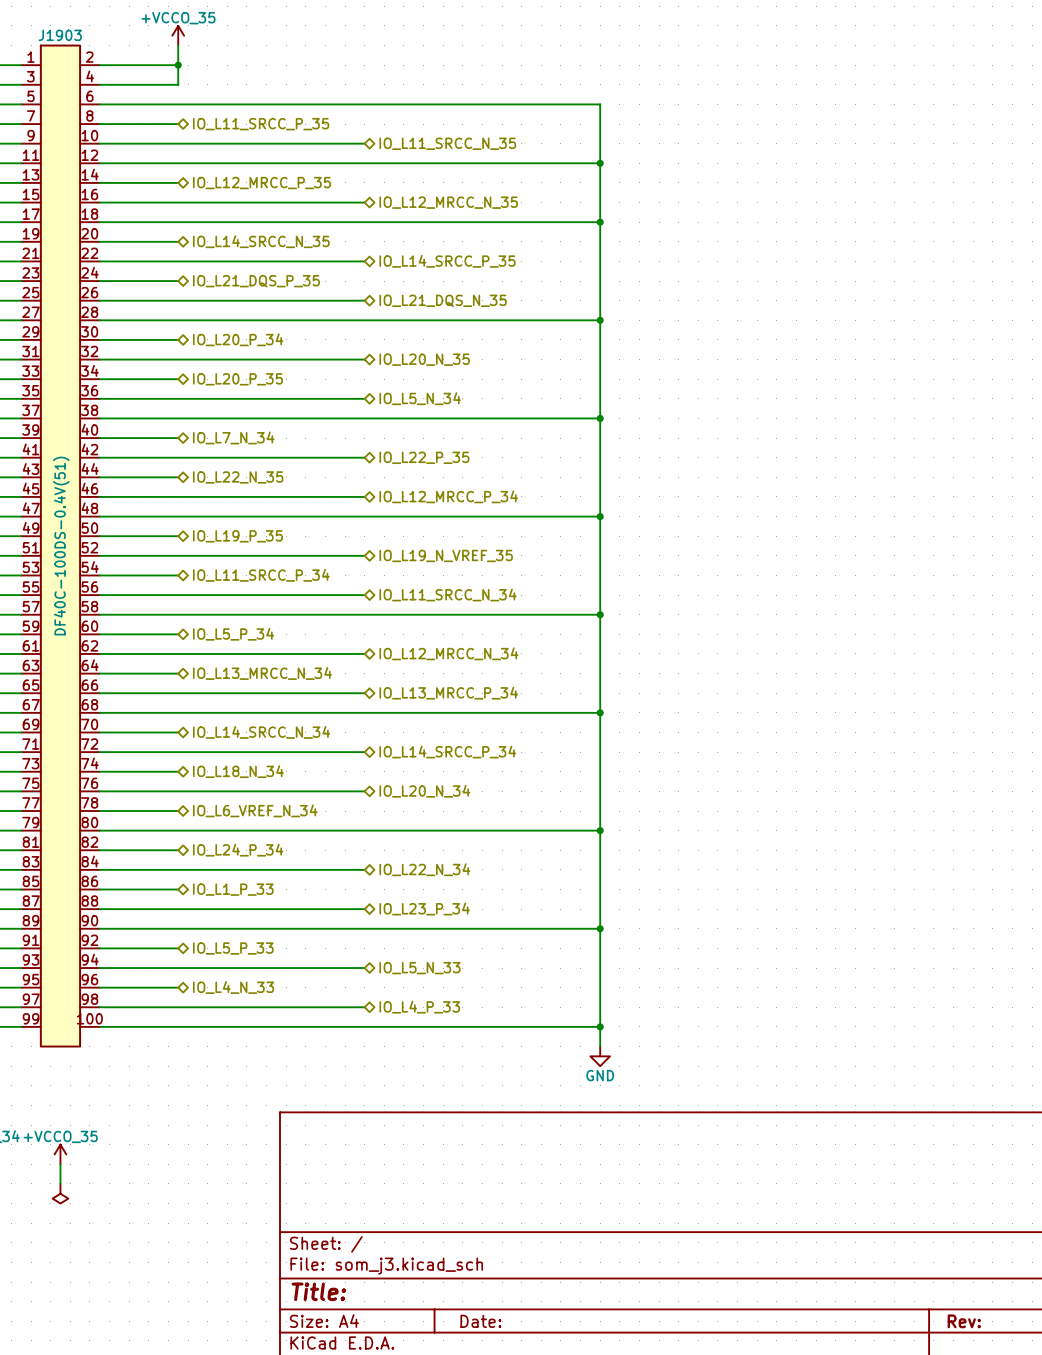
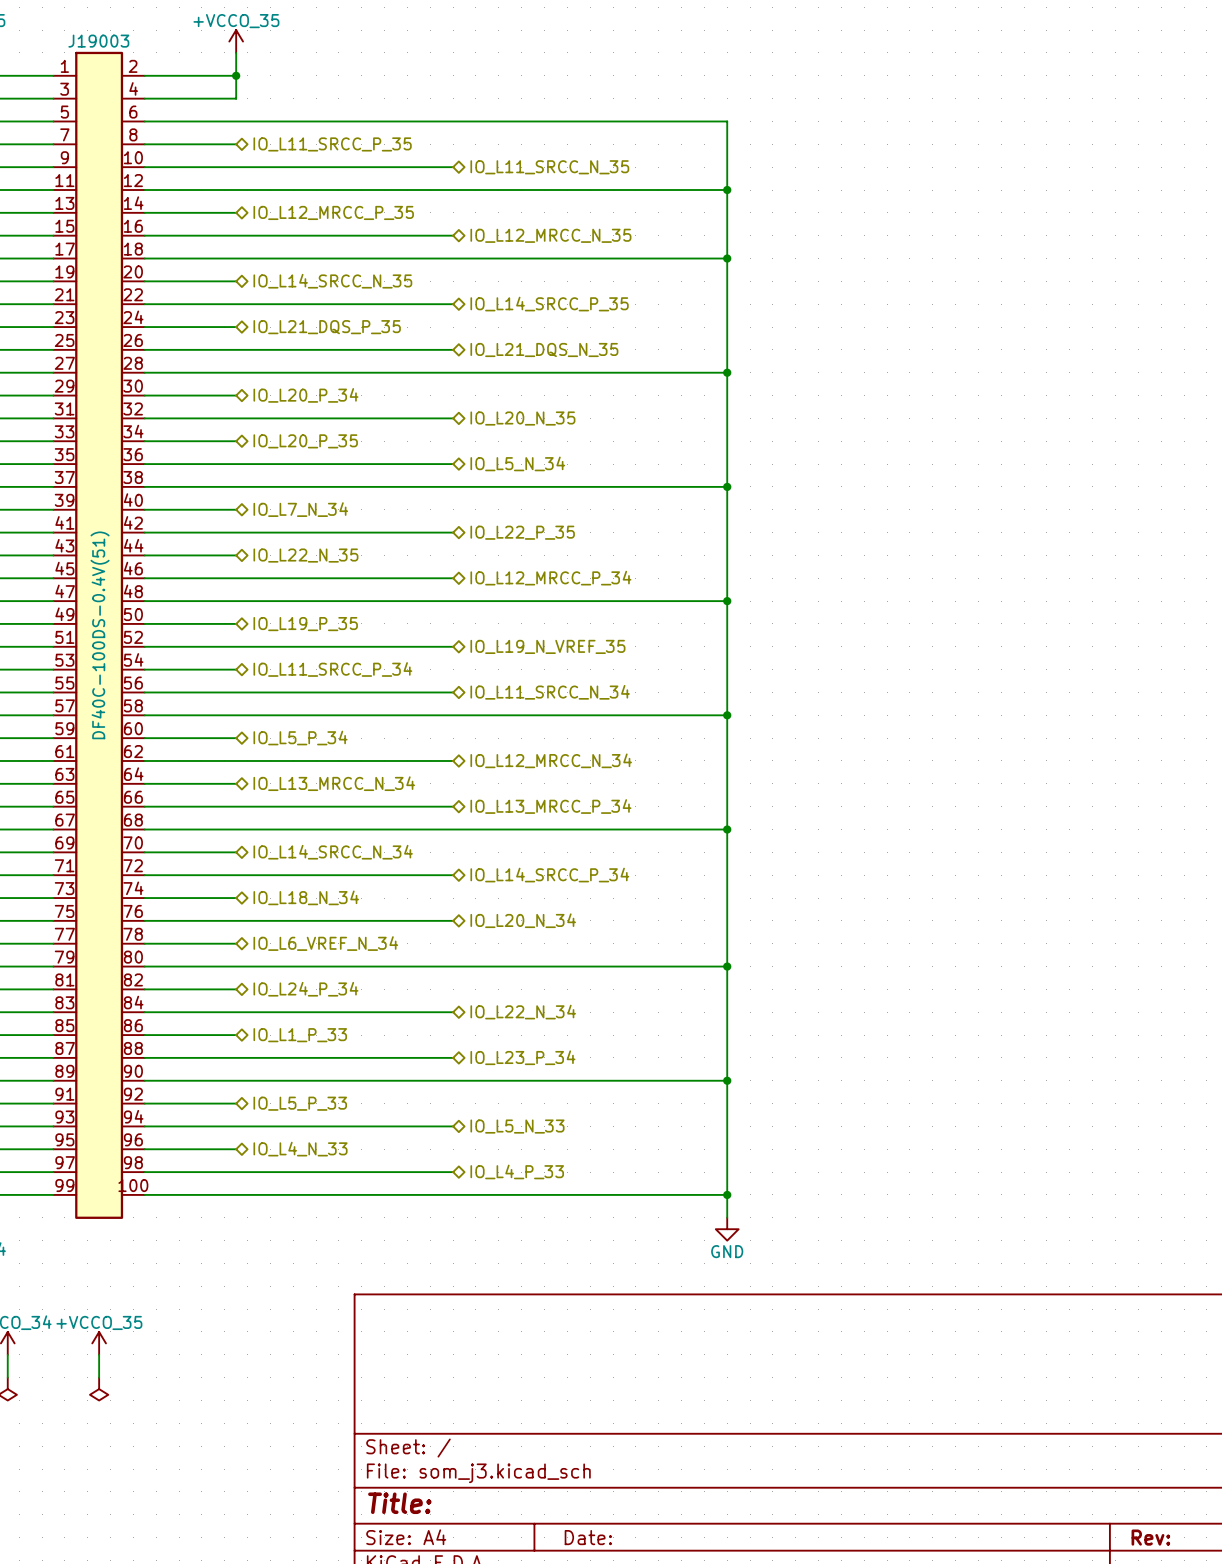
J1903 name: J1903 (60, 35) -> J19003 (98, 41)

